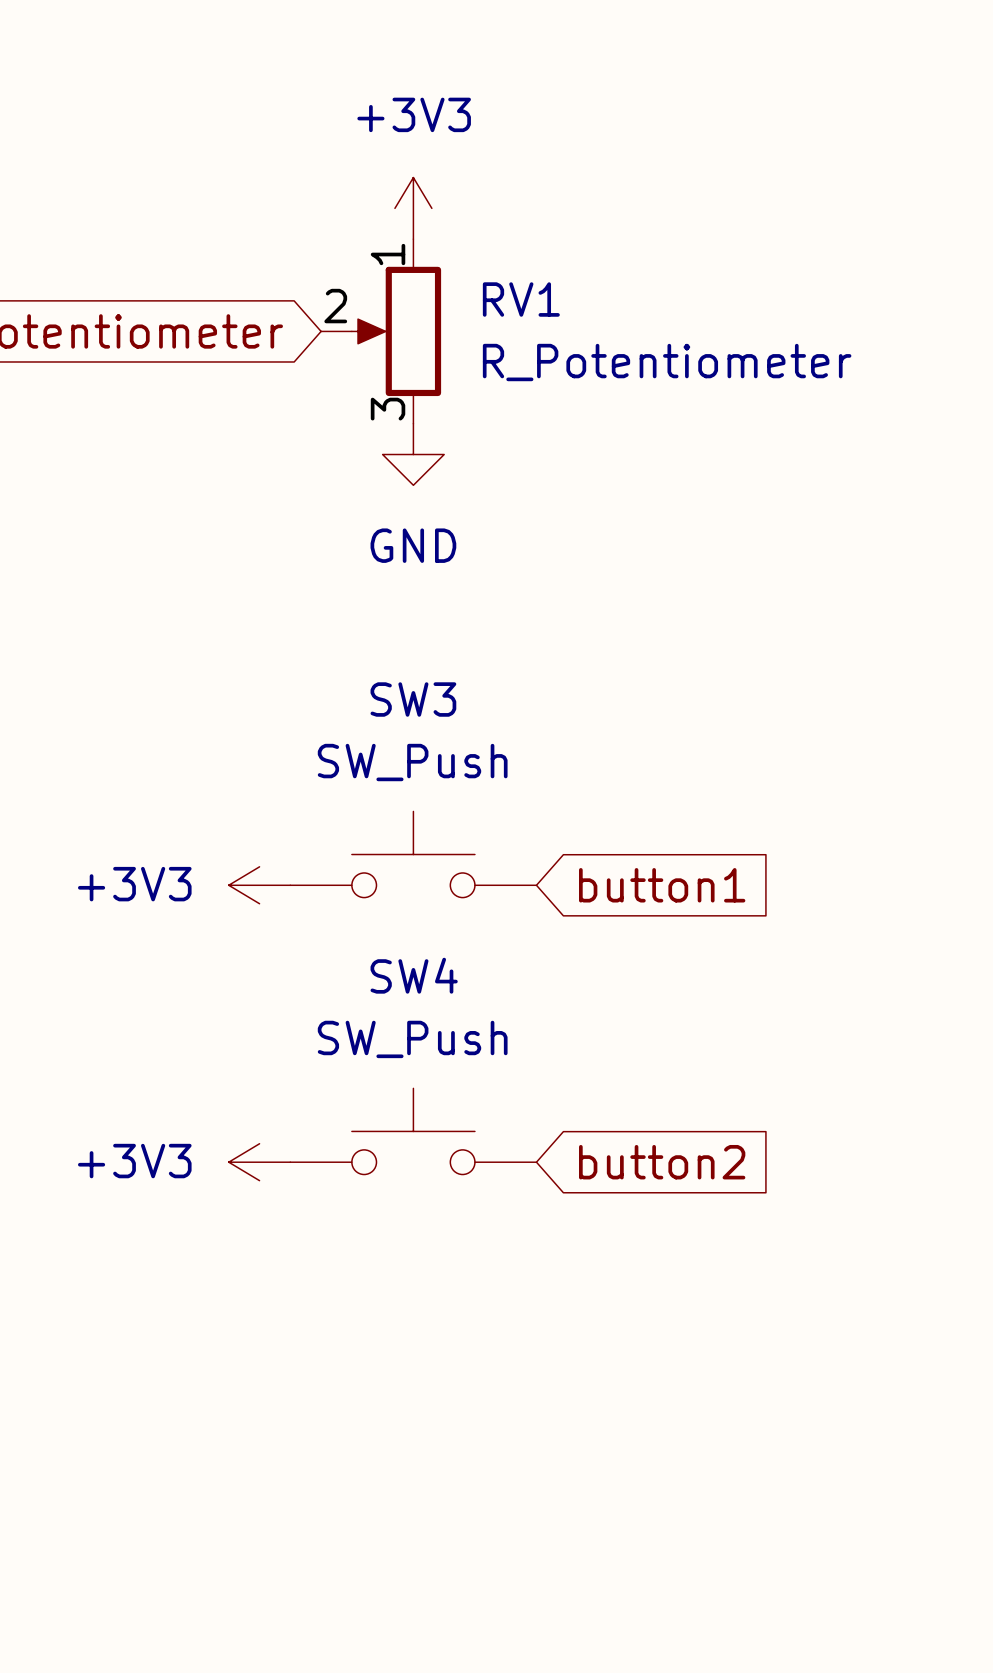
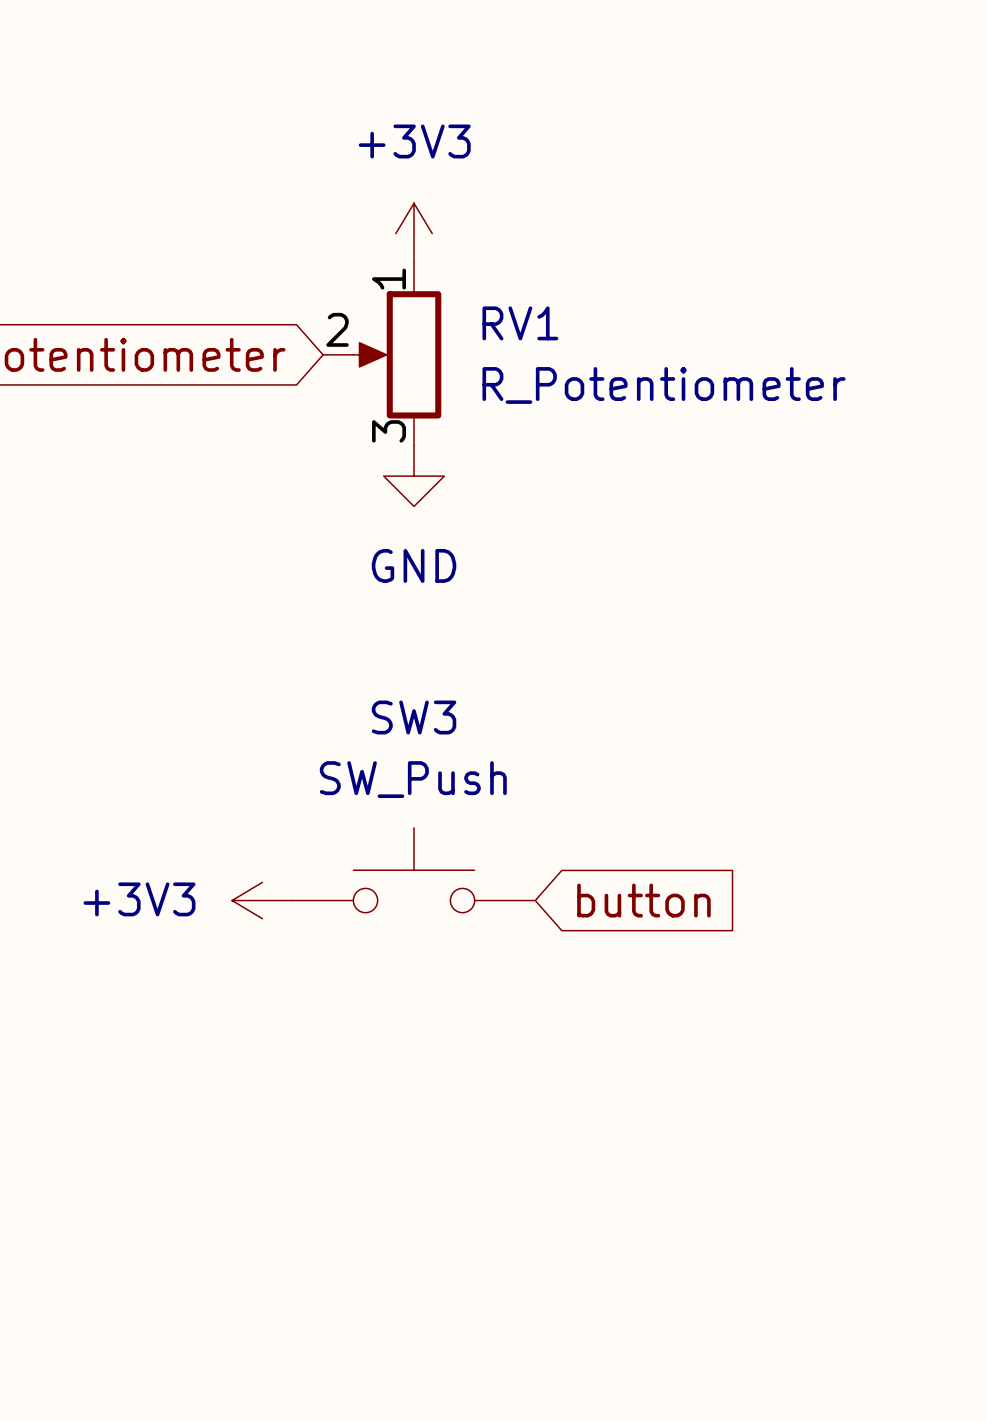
global label: button1 (662, 885) -> button (643, 900)
SW4: SW_Push (413, 1131) -> none
power symbol: +3V3 (259, 1162) -> none
global label: button2 (662, 1162) -> none

